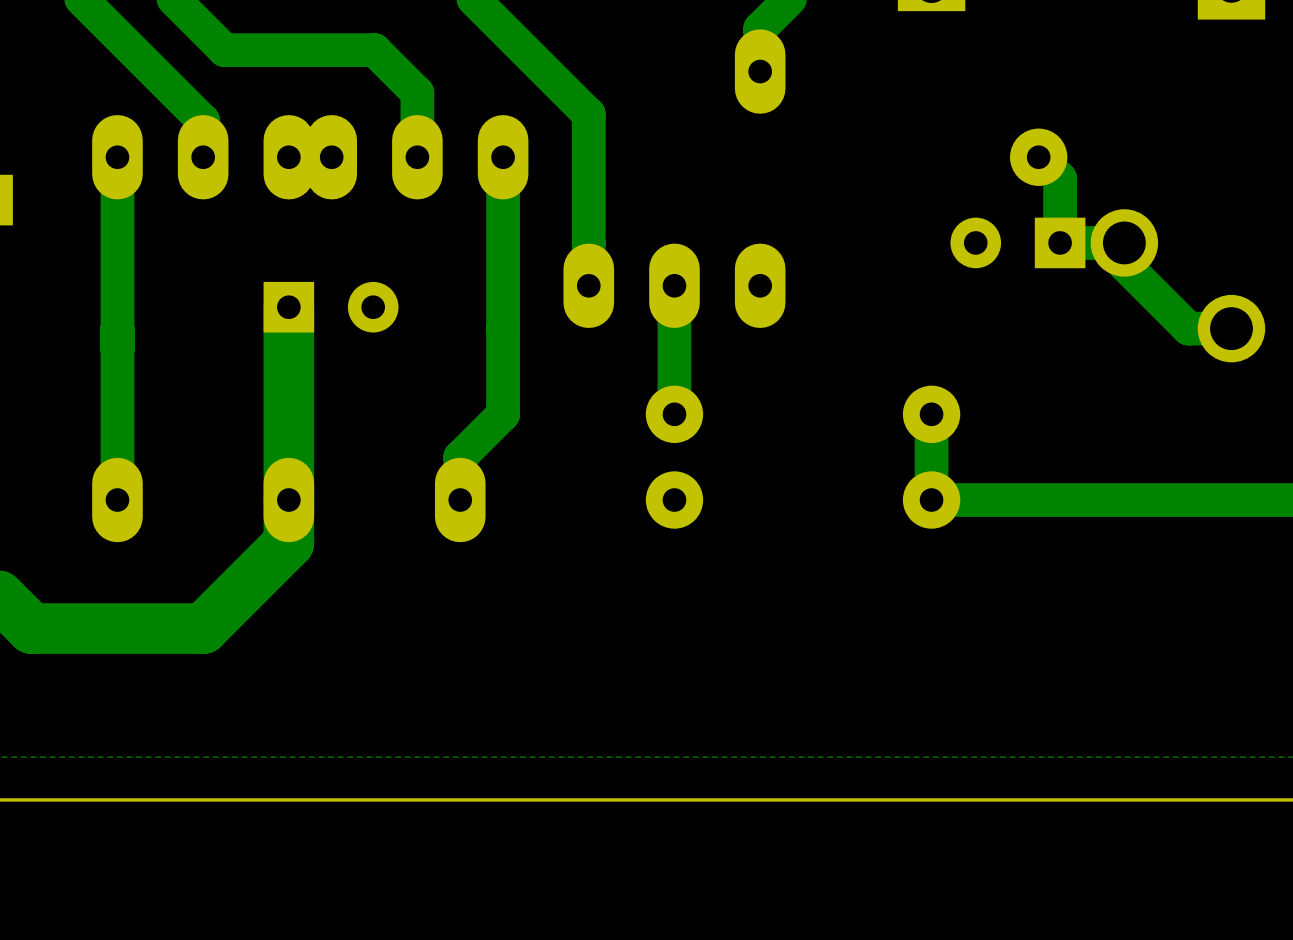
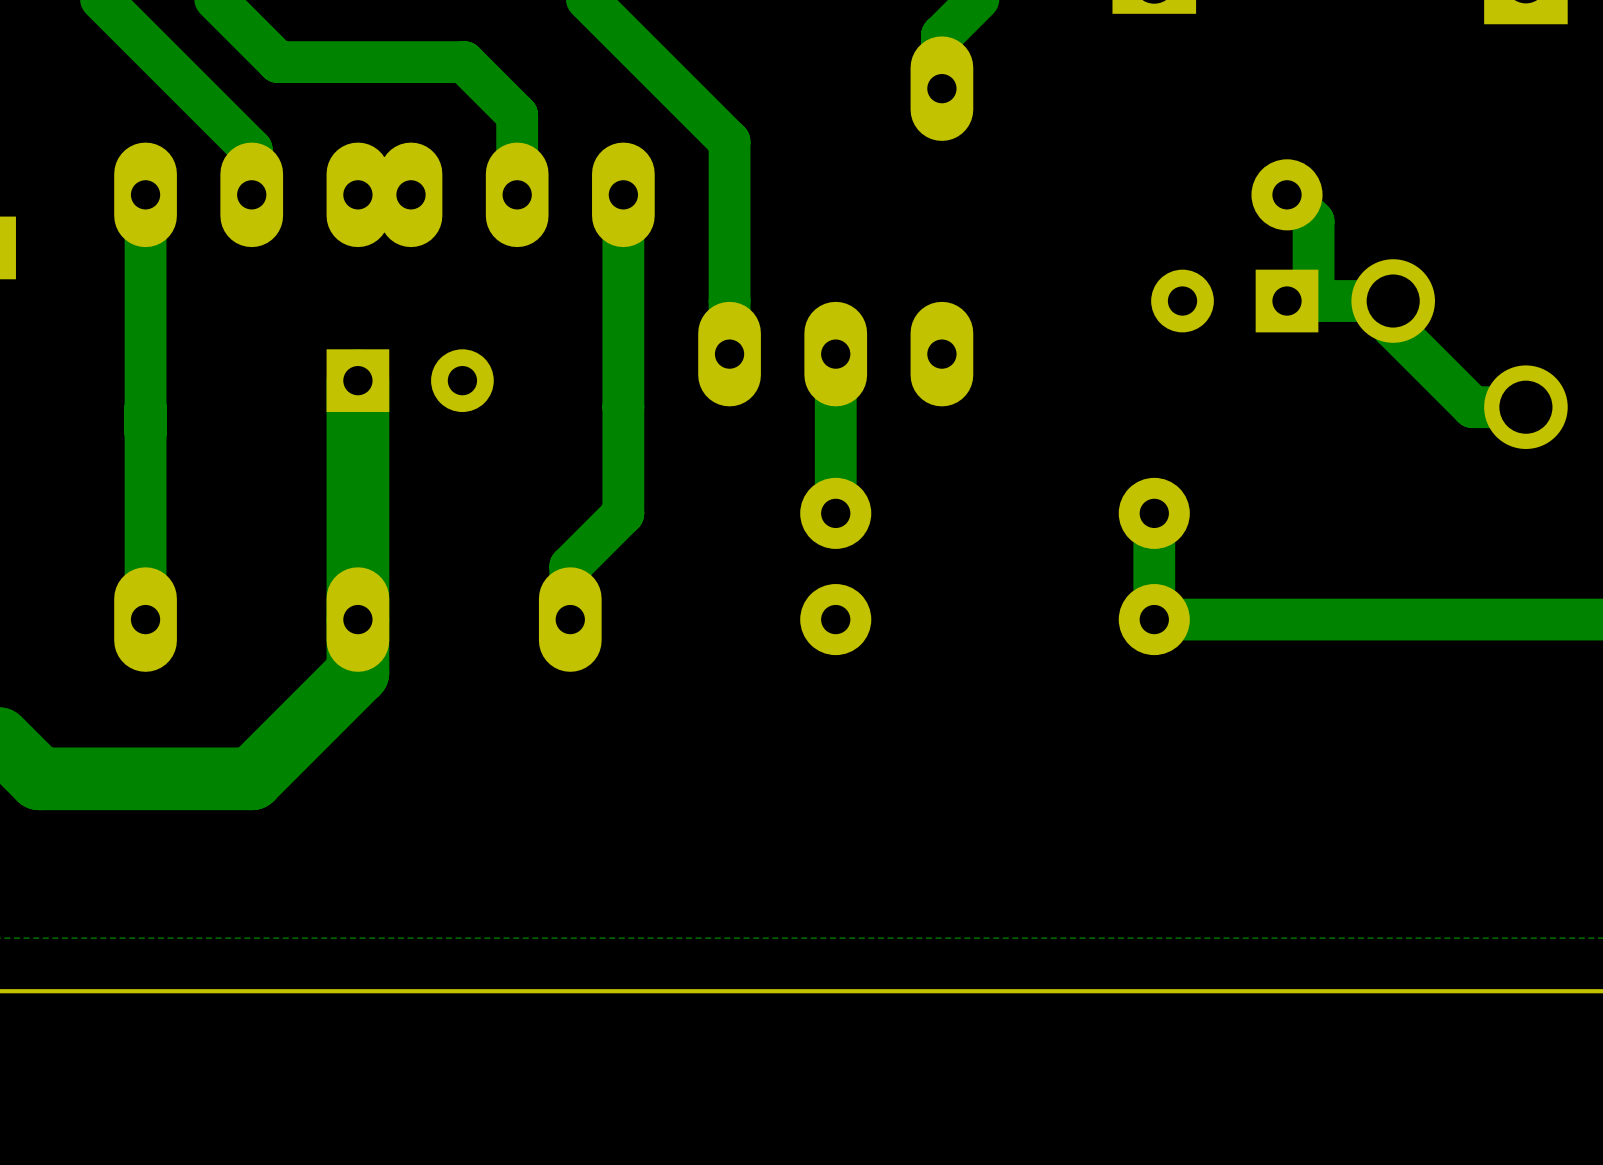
part position: (1017, 242) -> (1234, 301)

